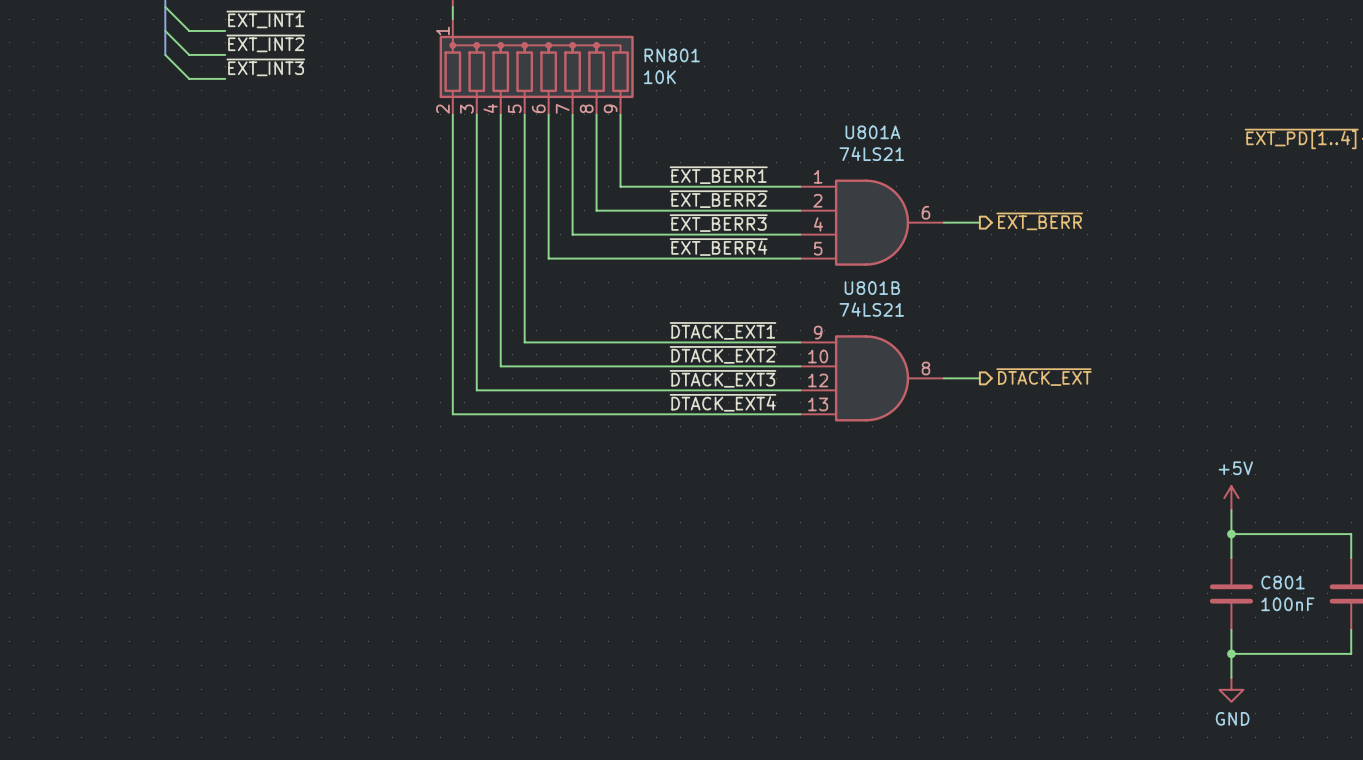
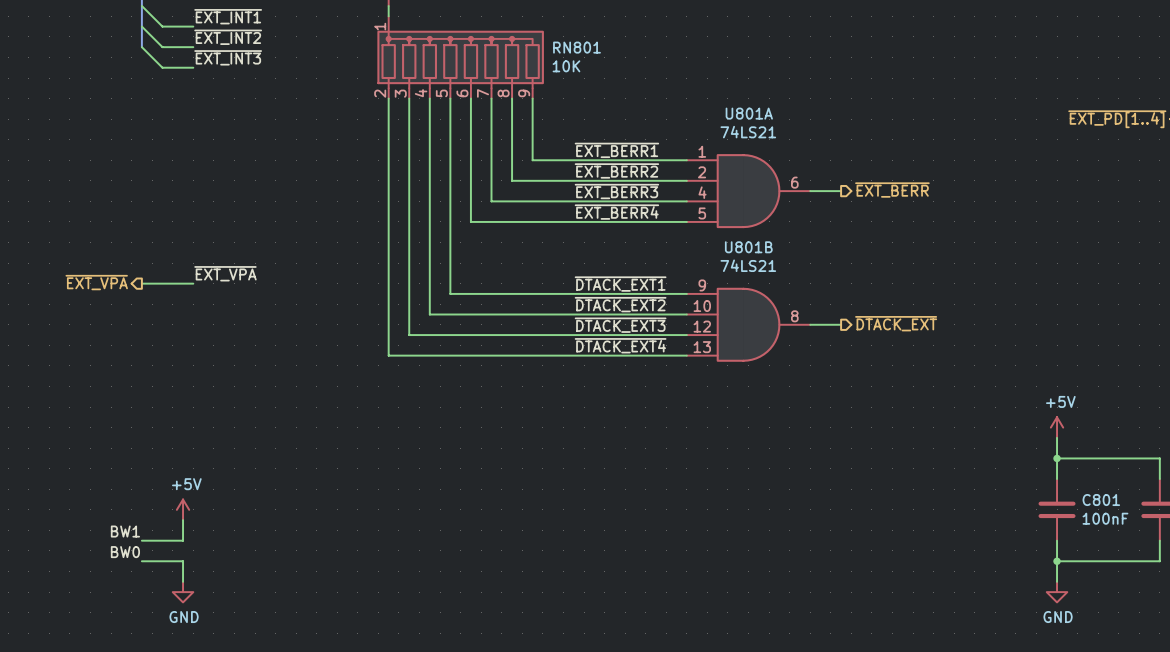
label: none -> ~{EXT_VPA} (225, 273)
hierarchical label: none -> ~{EXT_VPA} (96, 282)
wire: none -> (141, 283) (193, 283)
power symbol: none -> +5V (183, 509)
wire: none -> (183, 520) (183, 540) (141, 540)
label: none -> BW1 (125, 531)
label: none -> BW0 (125, 552)
wire: none -> (141, 561) (183, 561) (183, 581)
power symbol: none -> GND (183, 592)

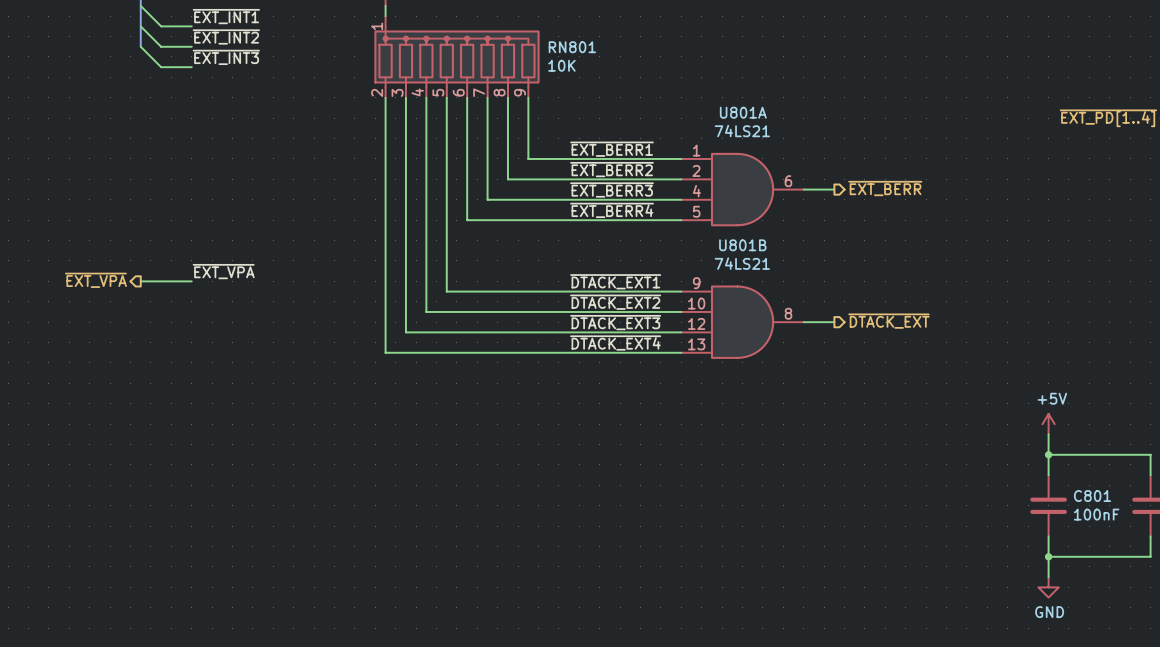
power symbol: +5V (183, 509) -> none
wire: (183, 520) (183, 540) (141, 540) -> none
label: BW1 (125, 531) -> none
label: BW0 (125, 552) -> none
wire: (141, 561) (183, 561) (183, 581) -> none
power symbol: GND (183, 592) -> none

